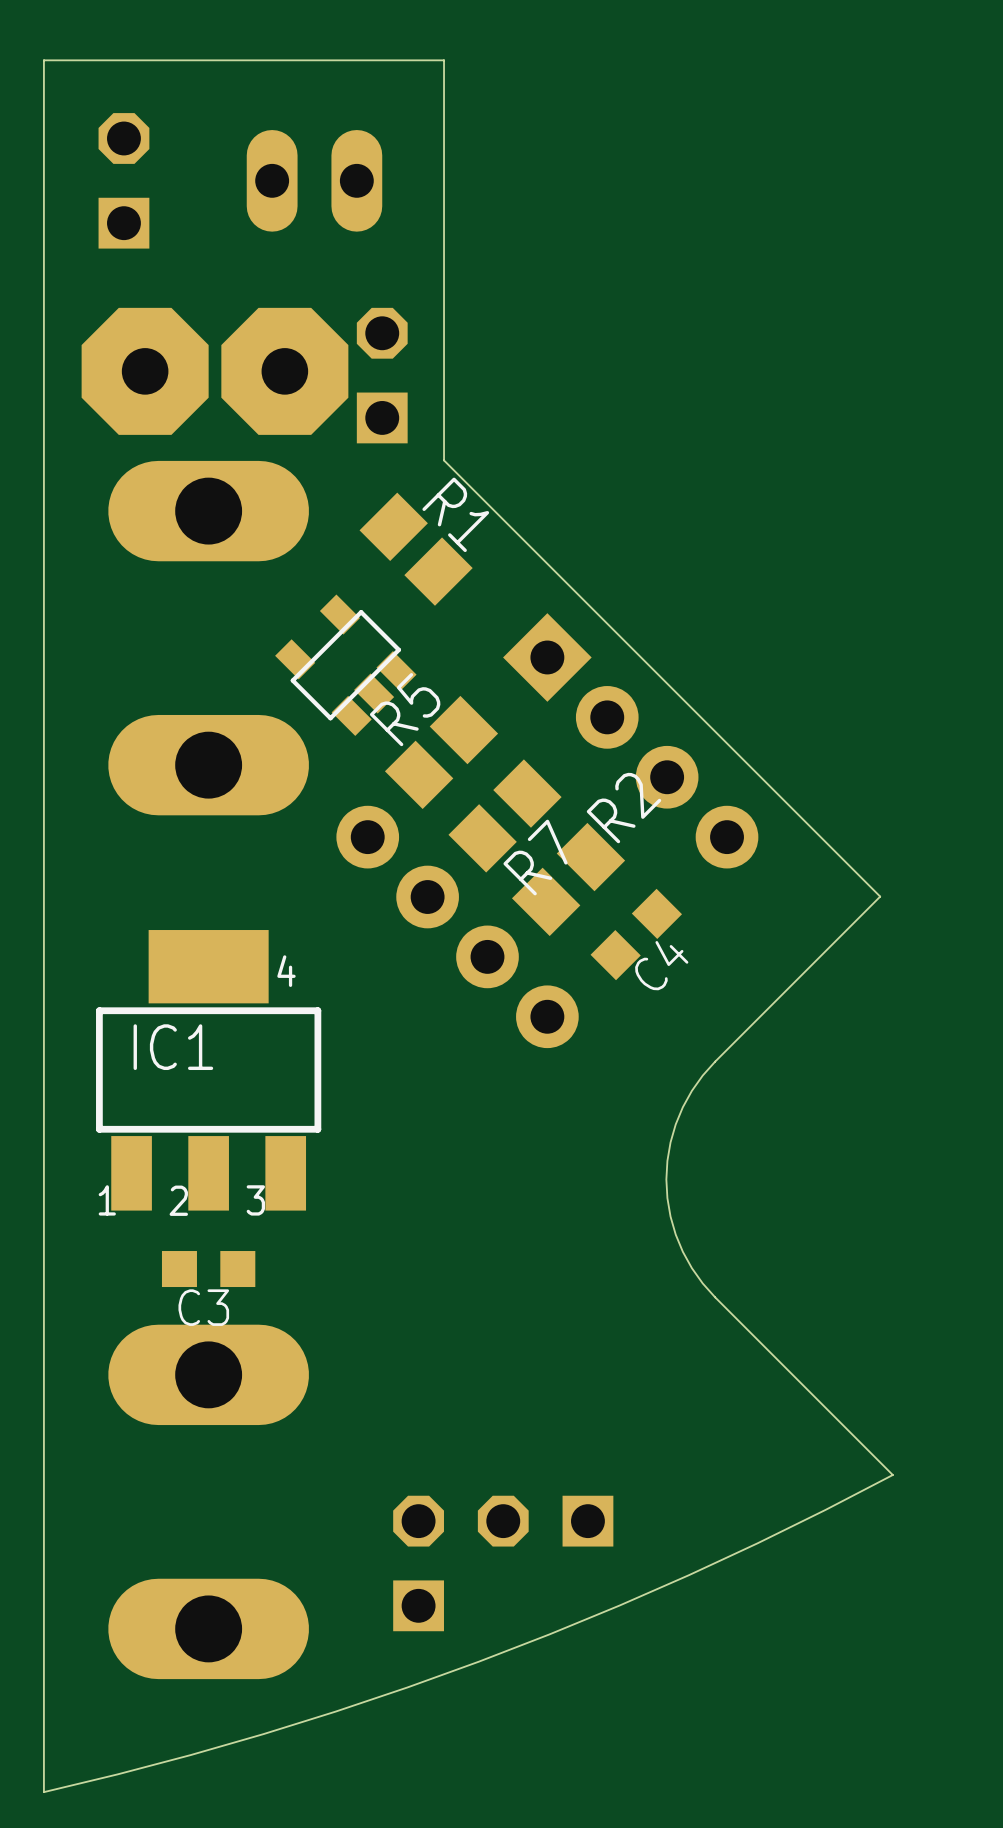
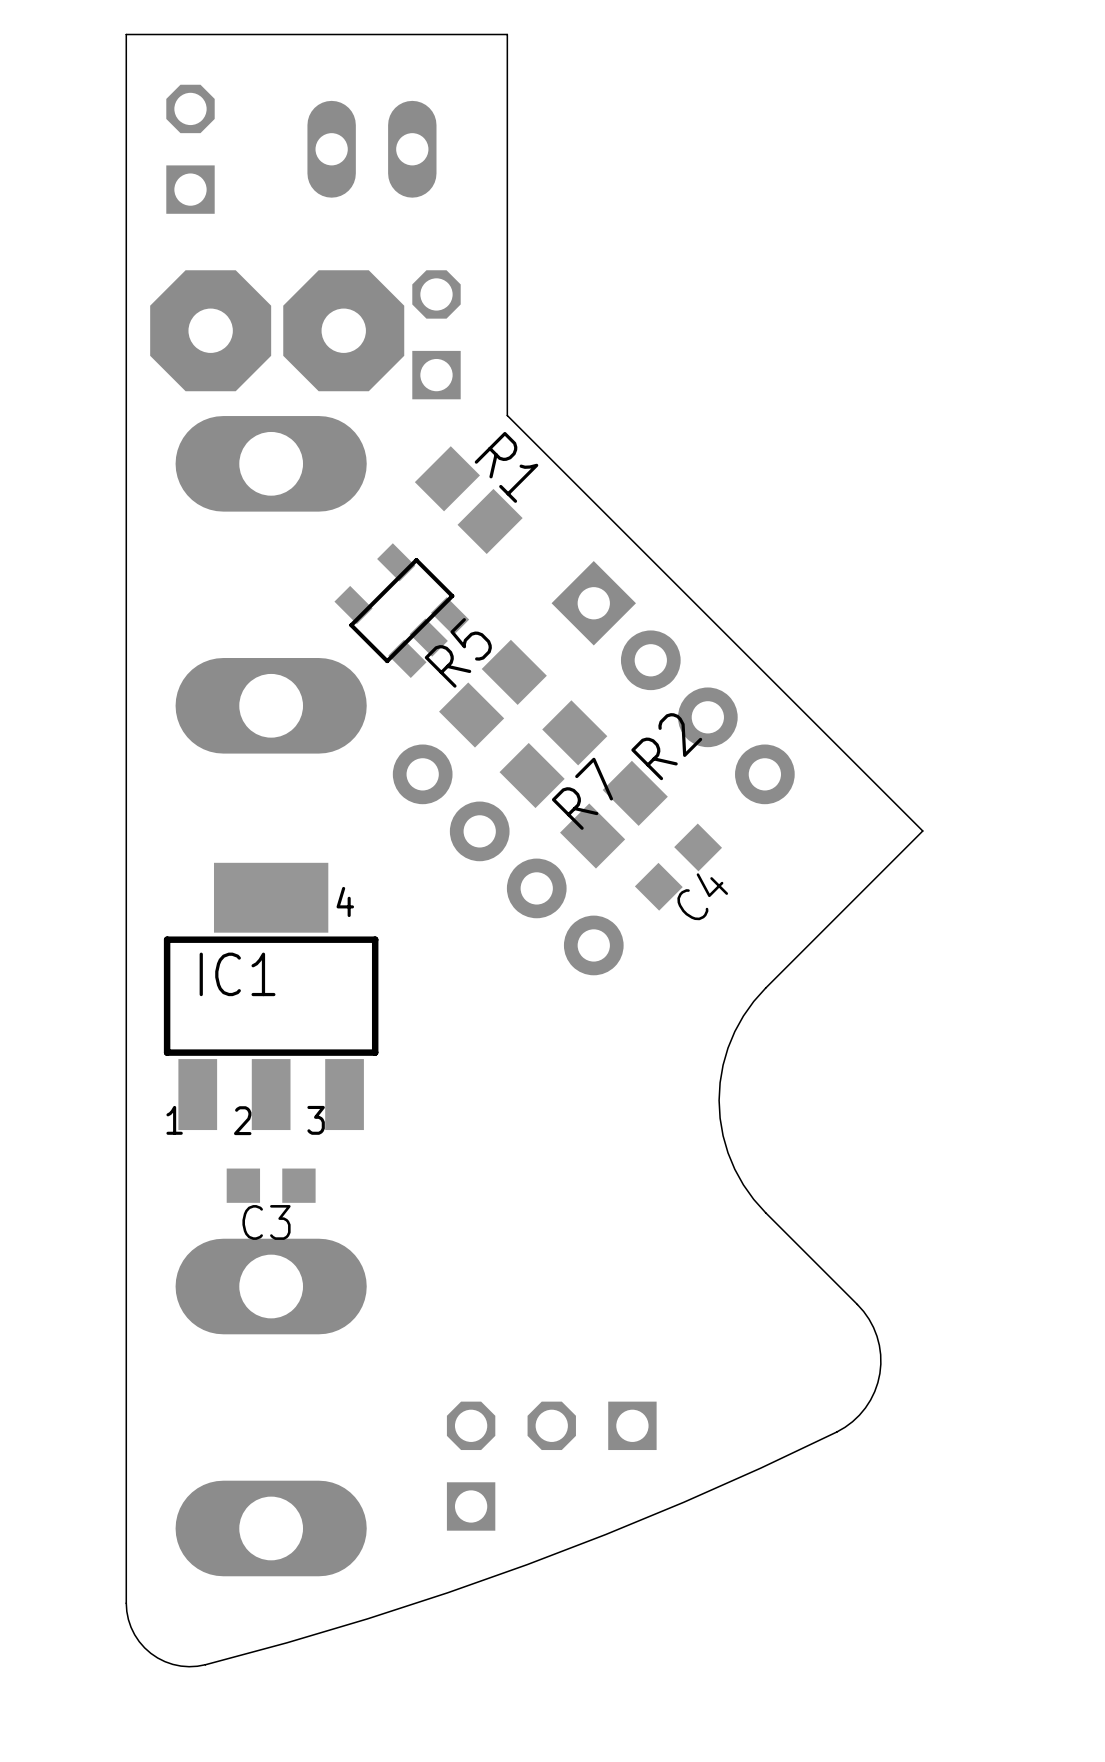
board edge: (444, 60) (444, 460) (880, 896) (702, 1075) (691, 1090) (675, 1124) (667, 1160) (666, 1179) (667, 1198) (675, 1234) (682, 1251) (702, 1283) (892, 1475) (757, 1543) (688, 1575) (619, 1605) (478, 1661) (407, 1687) (263, 1734) (190, 1755) (43, 1792) (43, 60) (56, 60) -> (495, 34) (507, 34) (507, 415) (922, 831) (753, 1001) (734, 1031) (723, 1065) (720, 1082) (720, 1118) (723, 1135) (734, 1169) (753, 1199) (765, 1212) (863, 1311) (877, 1336) (880, 1354) (879, 1373) (870, 1400) (859, 1415) (845, 1427) (683, 1502) (527, 1564) (447, 1592) (286, 1642) (205, 1664) (189, 1666) (165, 1661) (144, 1647) (131, 1627) (126, 1603) (126, 34)

